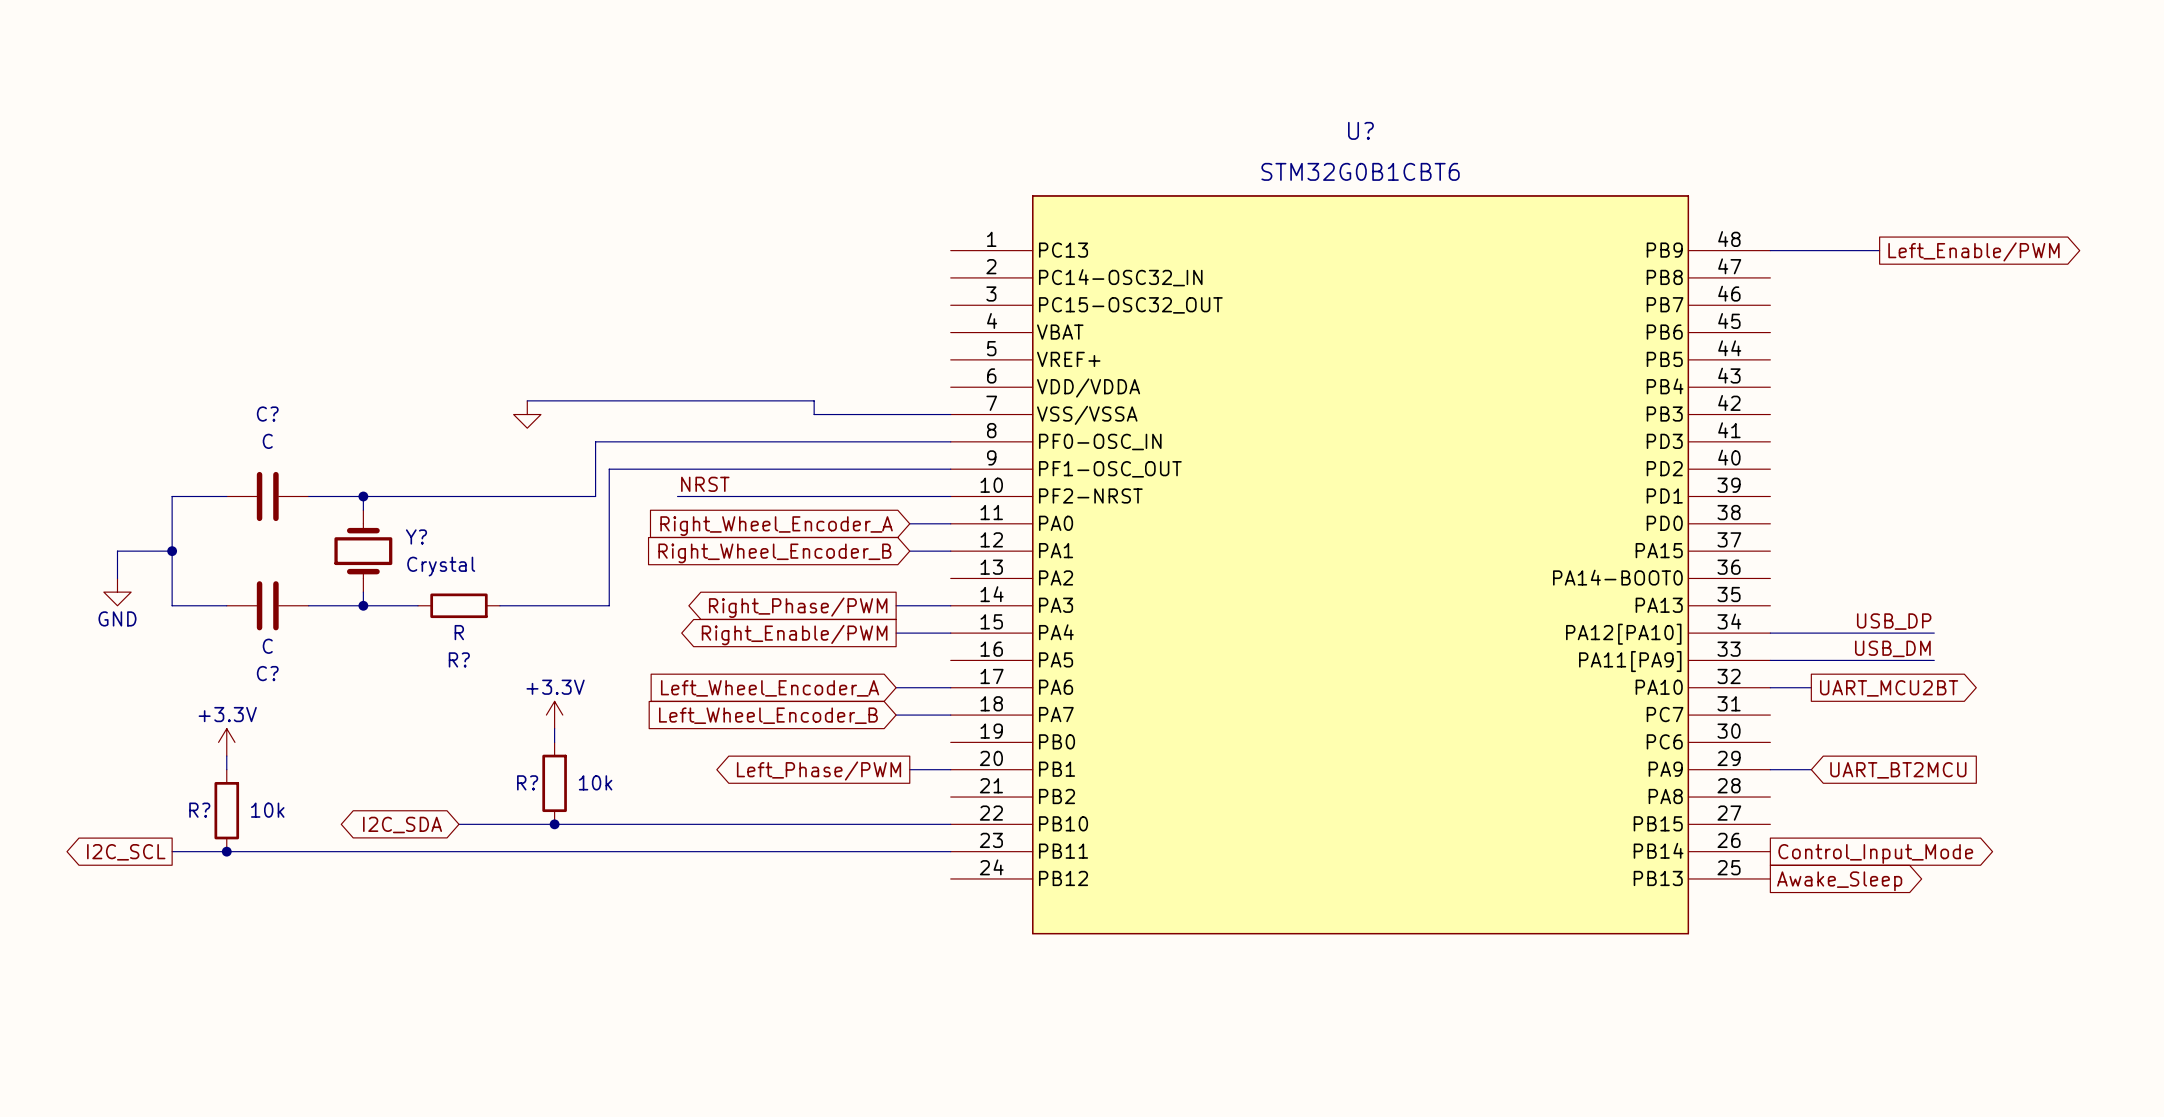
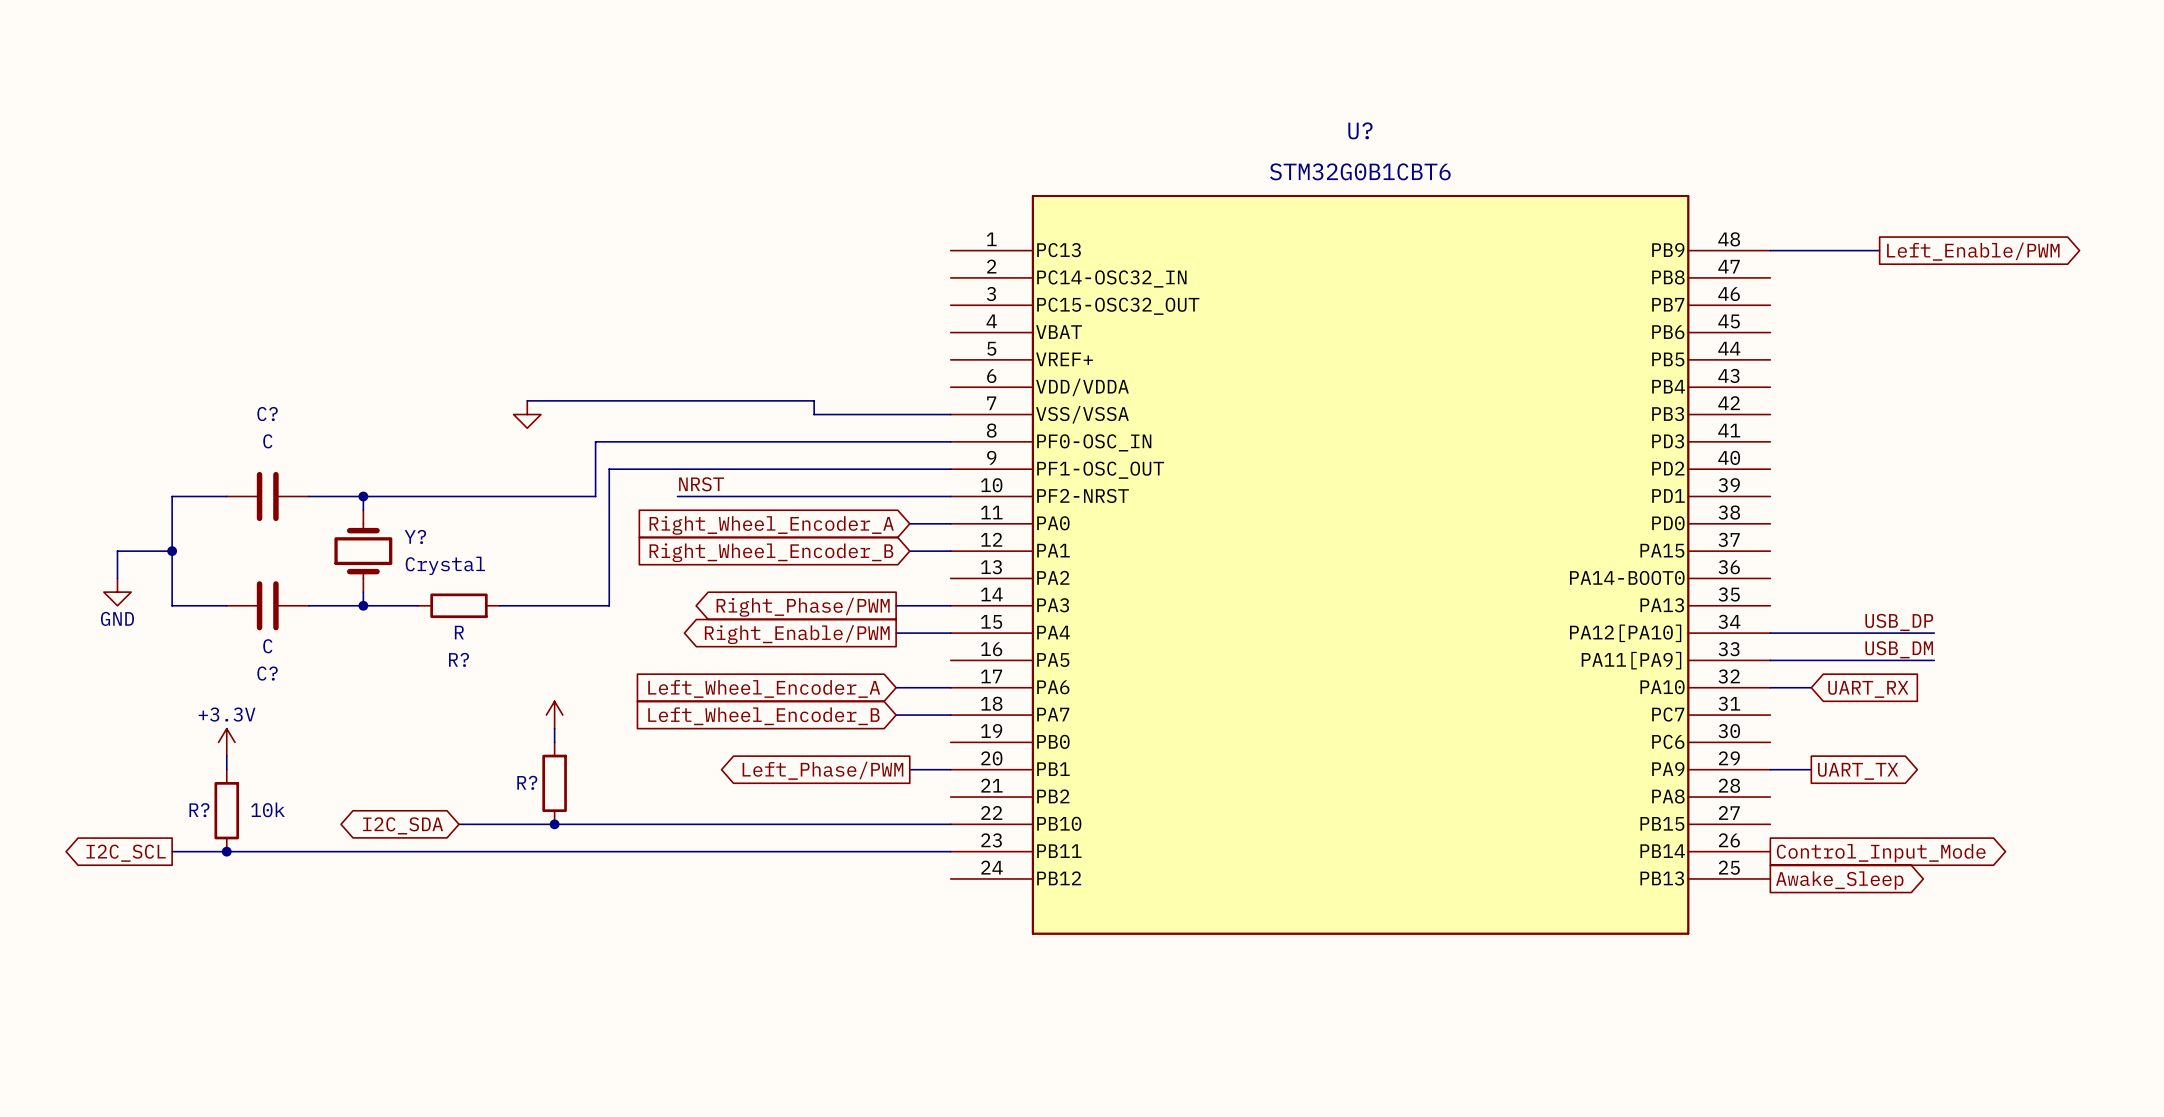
power symbol text: +3.3V (555, 687) -> none
global label shape: output (1889, 688) -> input (1868, 689)
global label: UART_MCU2BT (1889, 688) -> UART_RX (1868, 689)
global label shape: input (1898, 770) -> output (1858, 771)
global label: UART_BT2MCU (1898, 770) -> UART_TX (1858, 771)
R? value: 10k (595, 782) -> none

